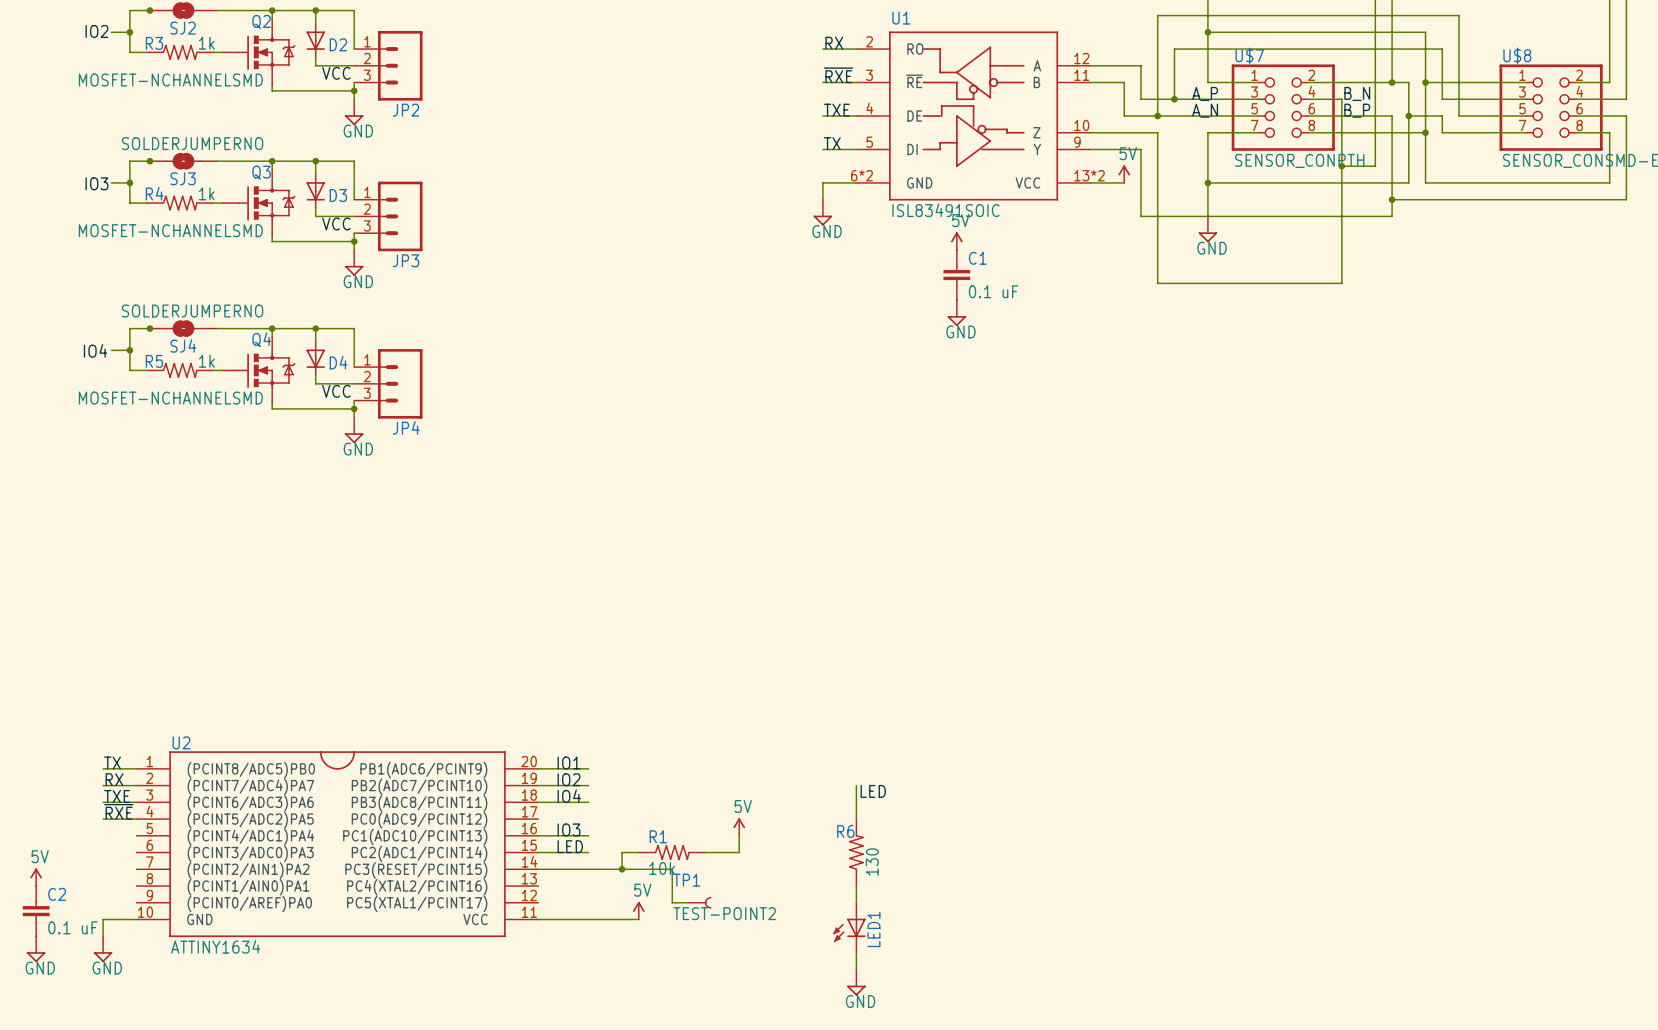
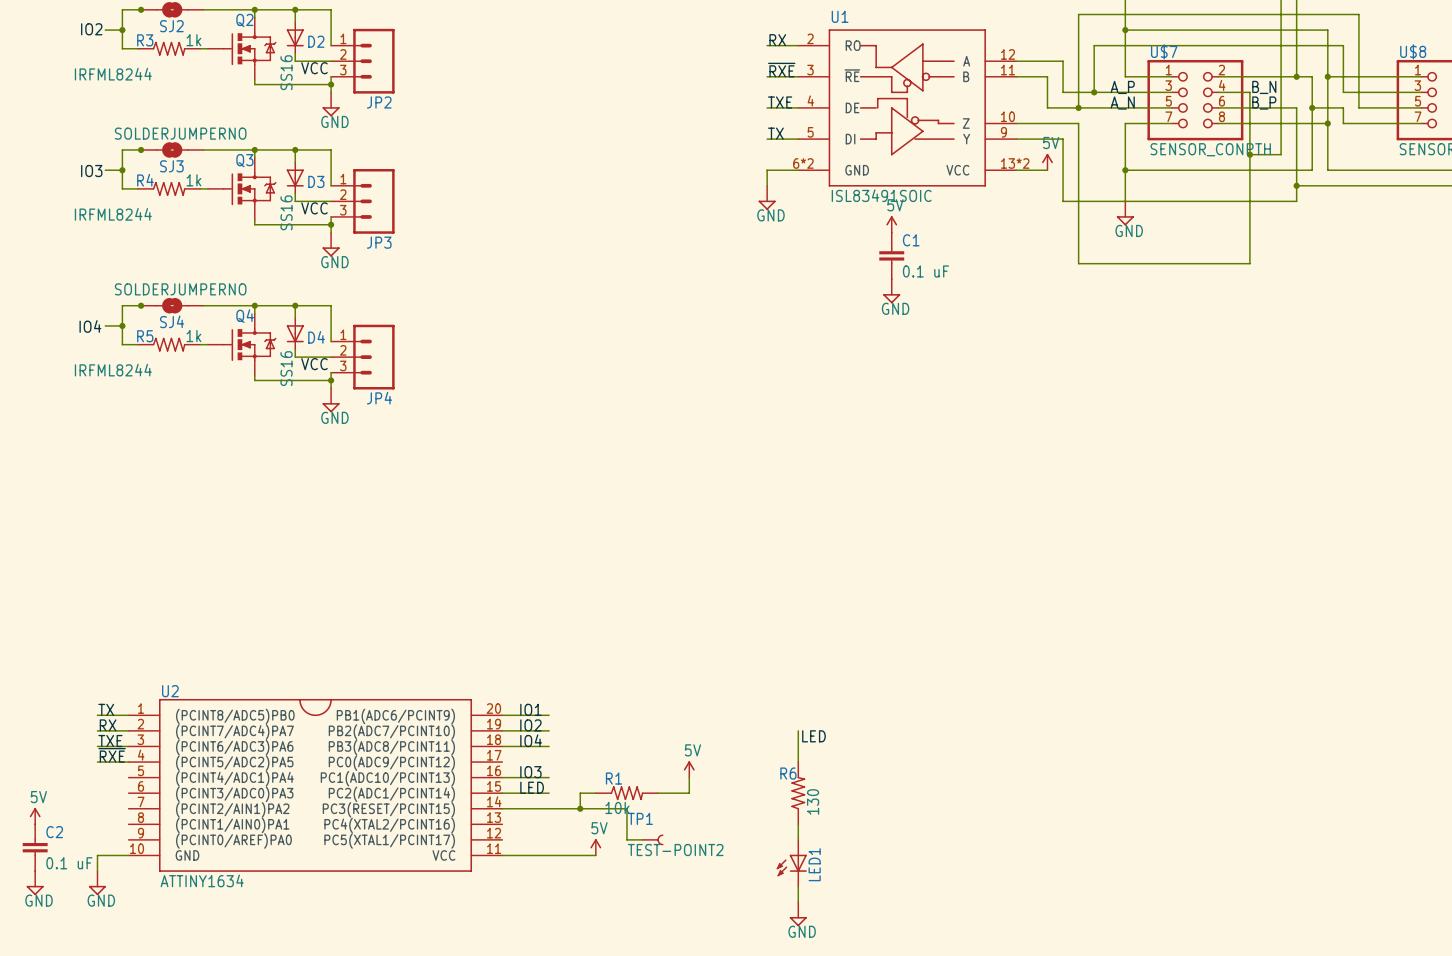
D2 value: none -> SS16 (286, 72)
Q2 value: MOSFET-NCHANNELSMD (170, 80) -> IRFML8244 (113, 74)
D3 value: none -> SS16 (286, 212)
Q3 value: MOSFET-NCHANNELSMD (170, 230) -> IRFML8244 (113, 214)
D4 value: none -> SS16 (286, 368)
Q4 value: MOSFET-NCHANNELSMD (170, 398) -> IRFML8244 (113, 370)

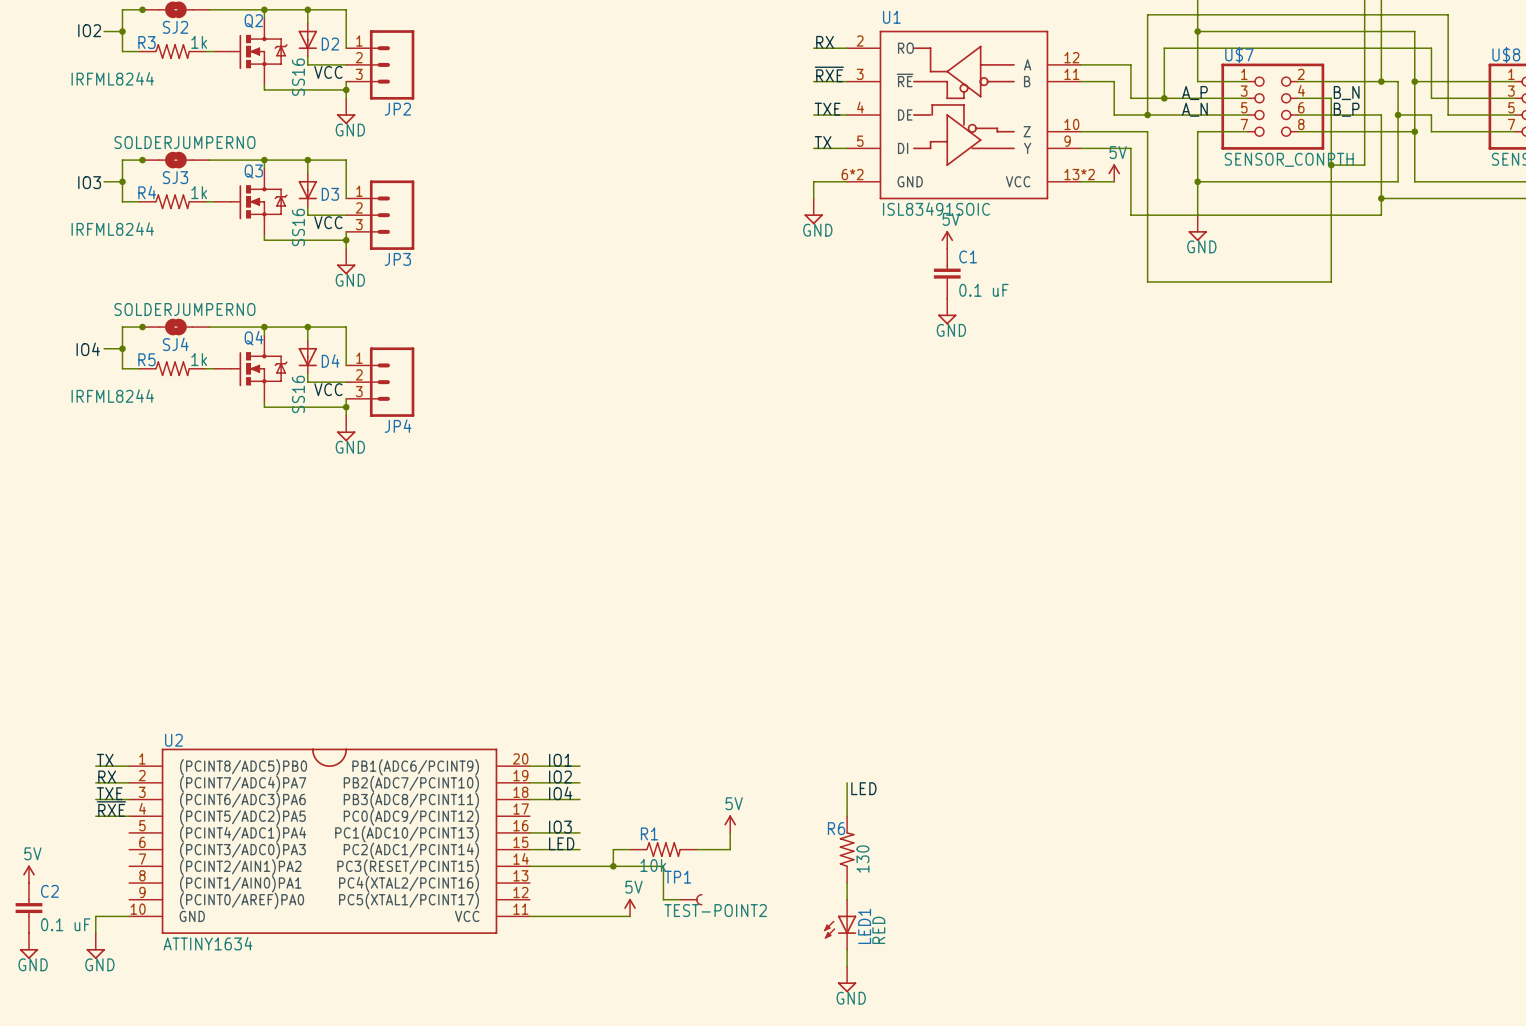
LED1 value: none -> RED (878, 930)

